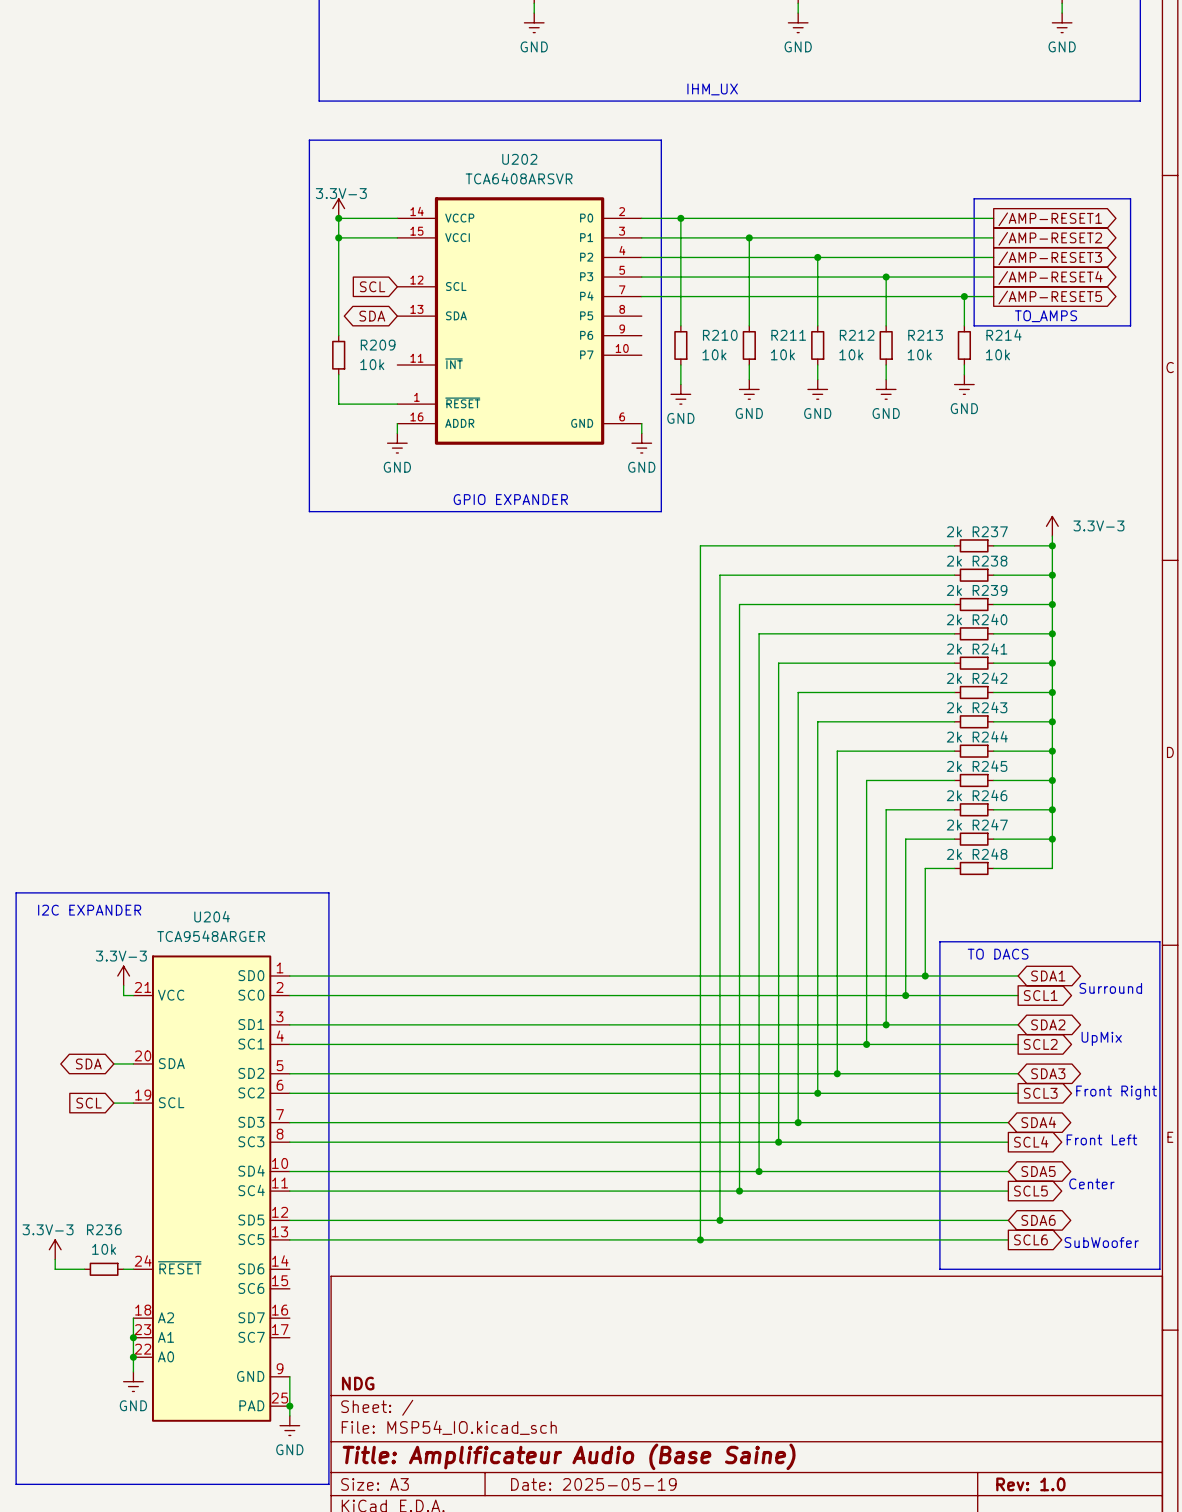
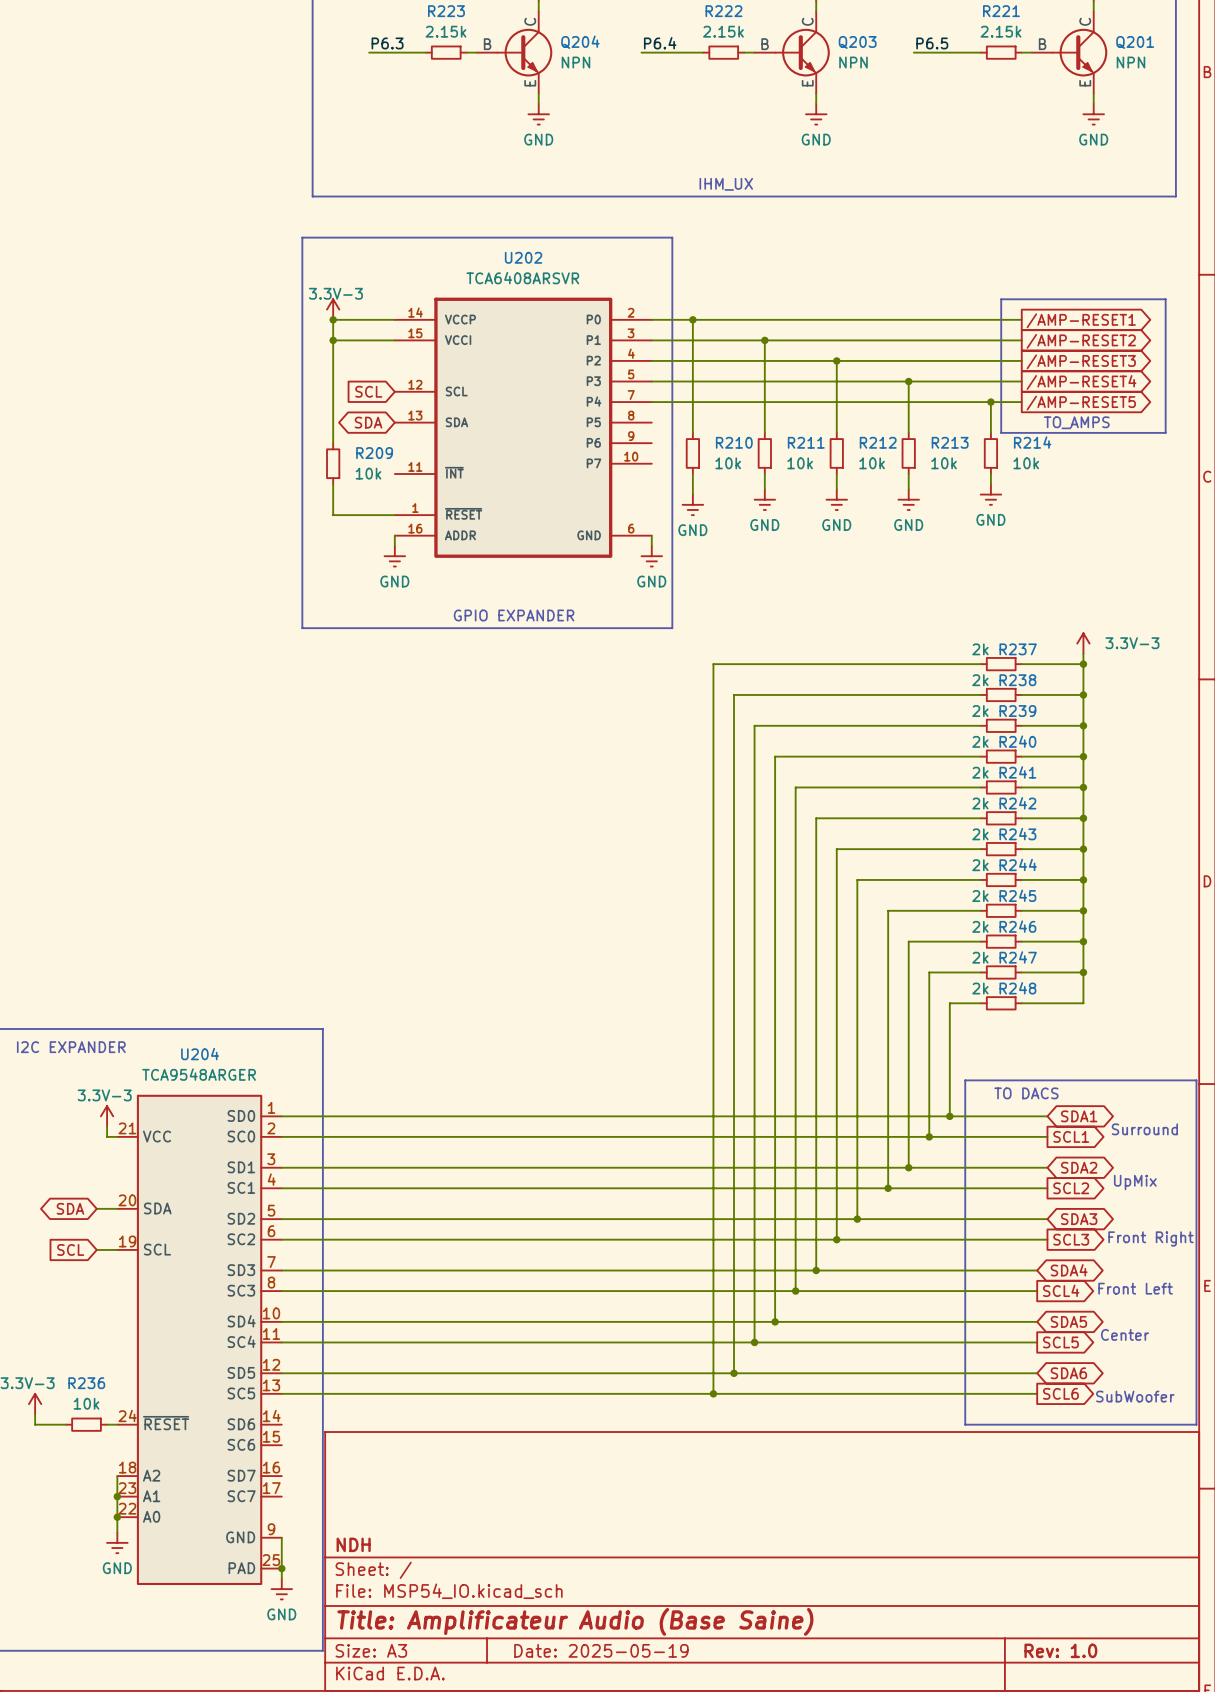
title block: NDG (358, 1383) -> NDH (353, 1544)

